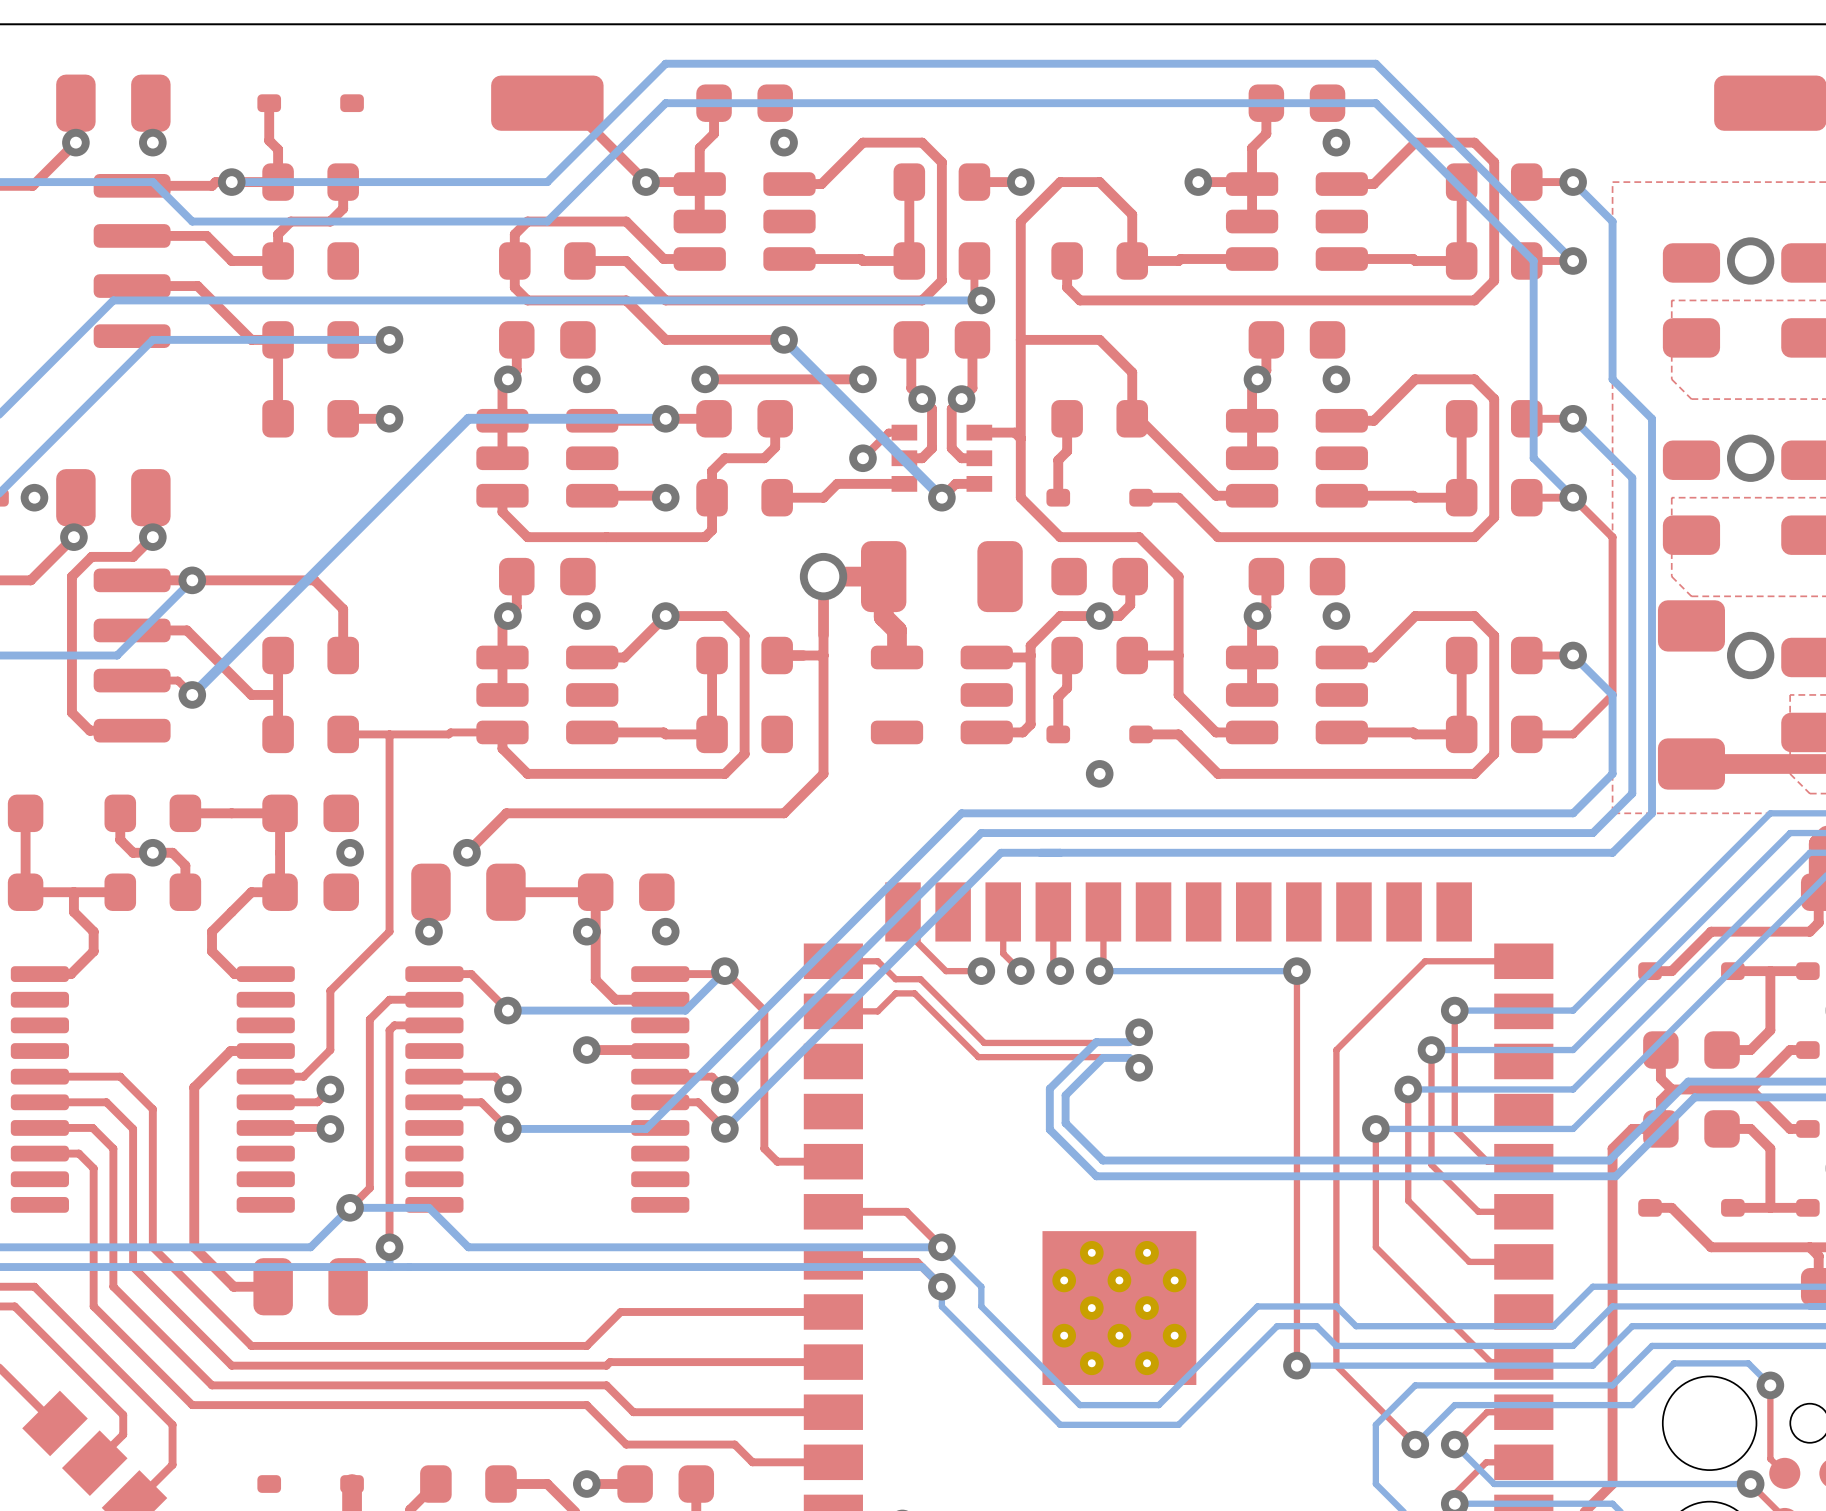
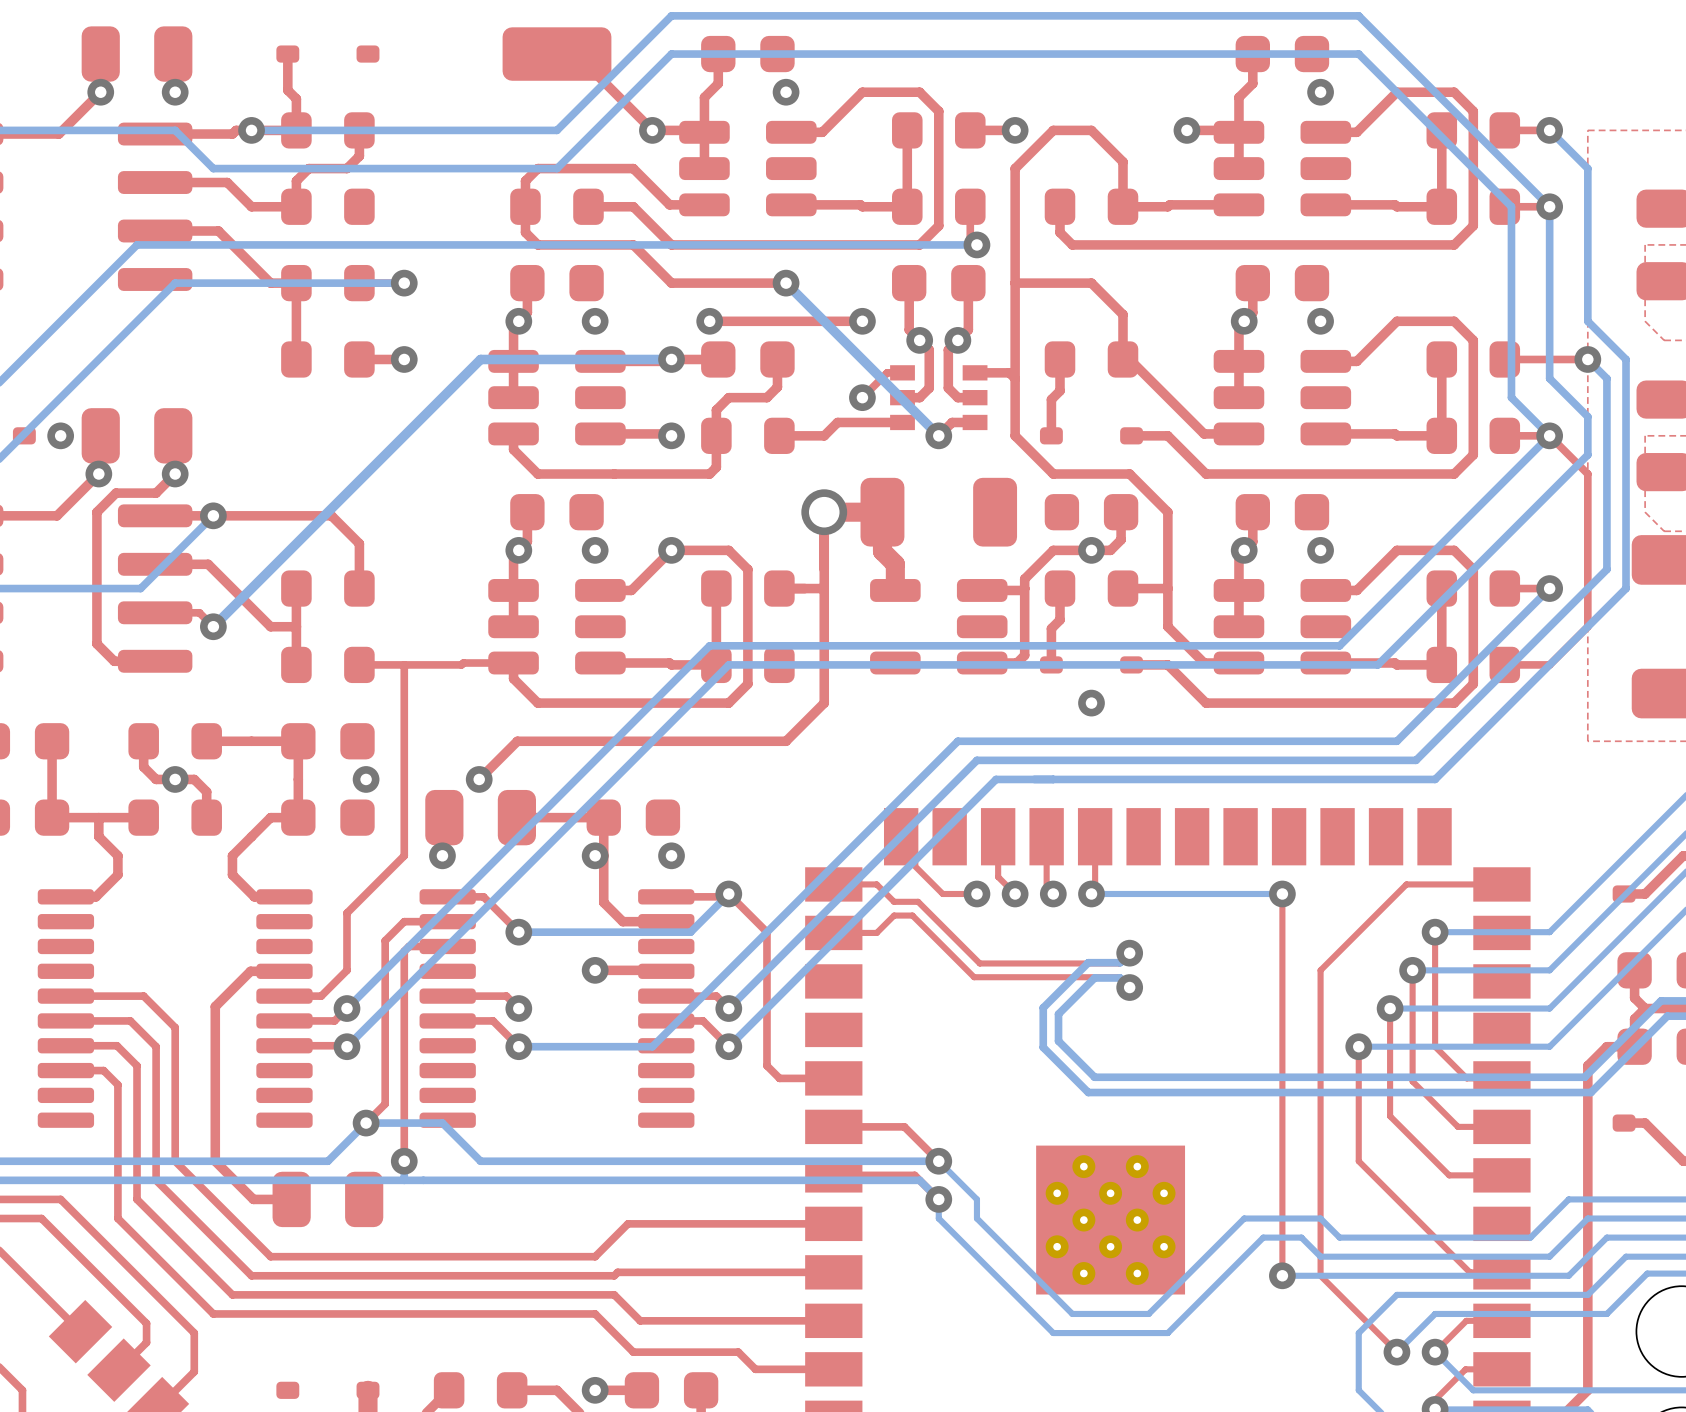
bottom track: none -> (1549, 206) (1549, 378) (1587, 416) (1587, 454) (1377, 664) (728, 664) (347, 1046)
bottom track: (1573, 418) (1632, 477) -> (1587, 359) (1606, 378) (1606, 416)
via position: (1573, 418) -> (1587, 359)
top track: none -> (1587, 359) (1549, 359)
bottom track: none -> (1549, 435) (1339, 645) (709, 645) (347, 1008)
bottom track: (1632, 635) (1632, 793) (1592, 833) (1435, 833) -> (1606, 569) (1416, 760)
bottom track: (1573, 655) (1612, 694) (1612, 773) (1573, 813) (1415, 813) -> (1549, 588) (1396, 741)
bottom track: (1652, 655) (1652, 813) (1612, 852) (1454, 852) -> (1626, 588) (1435, 779)

